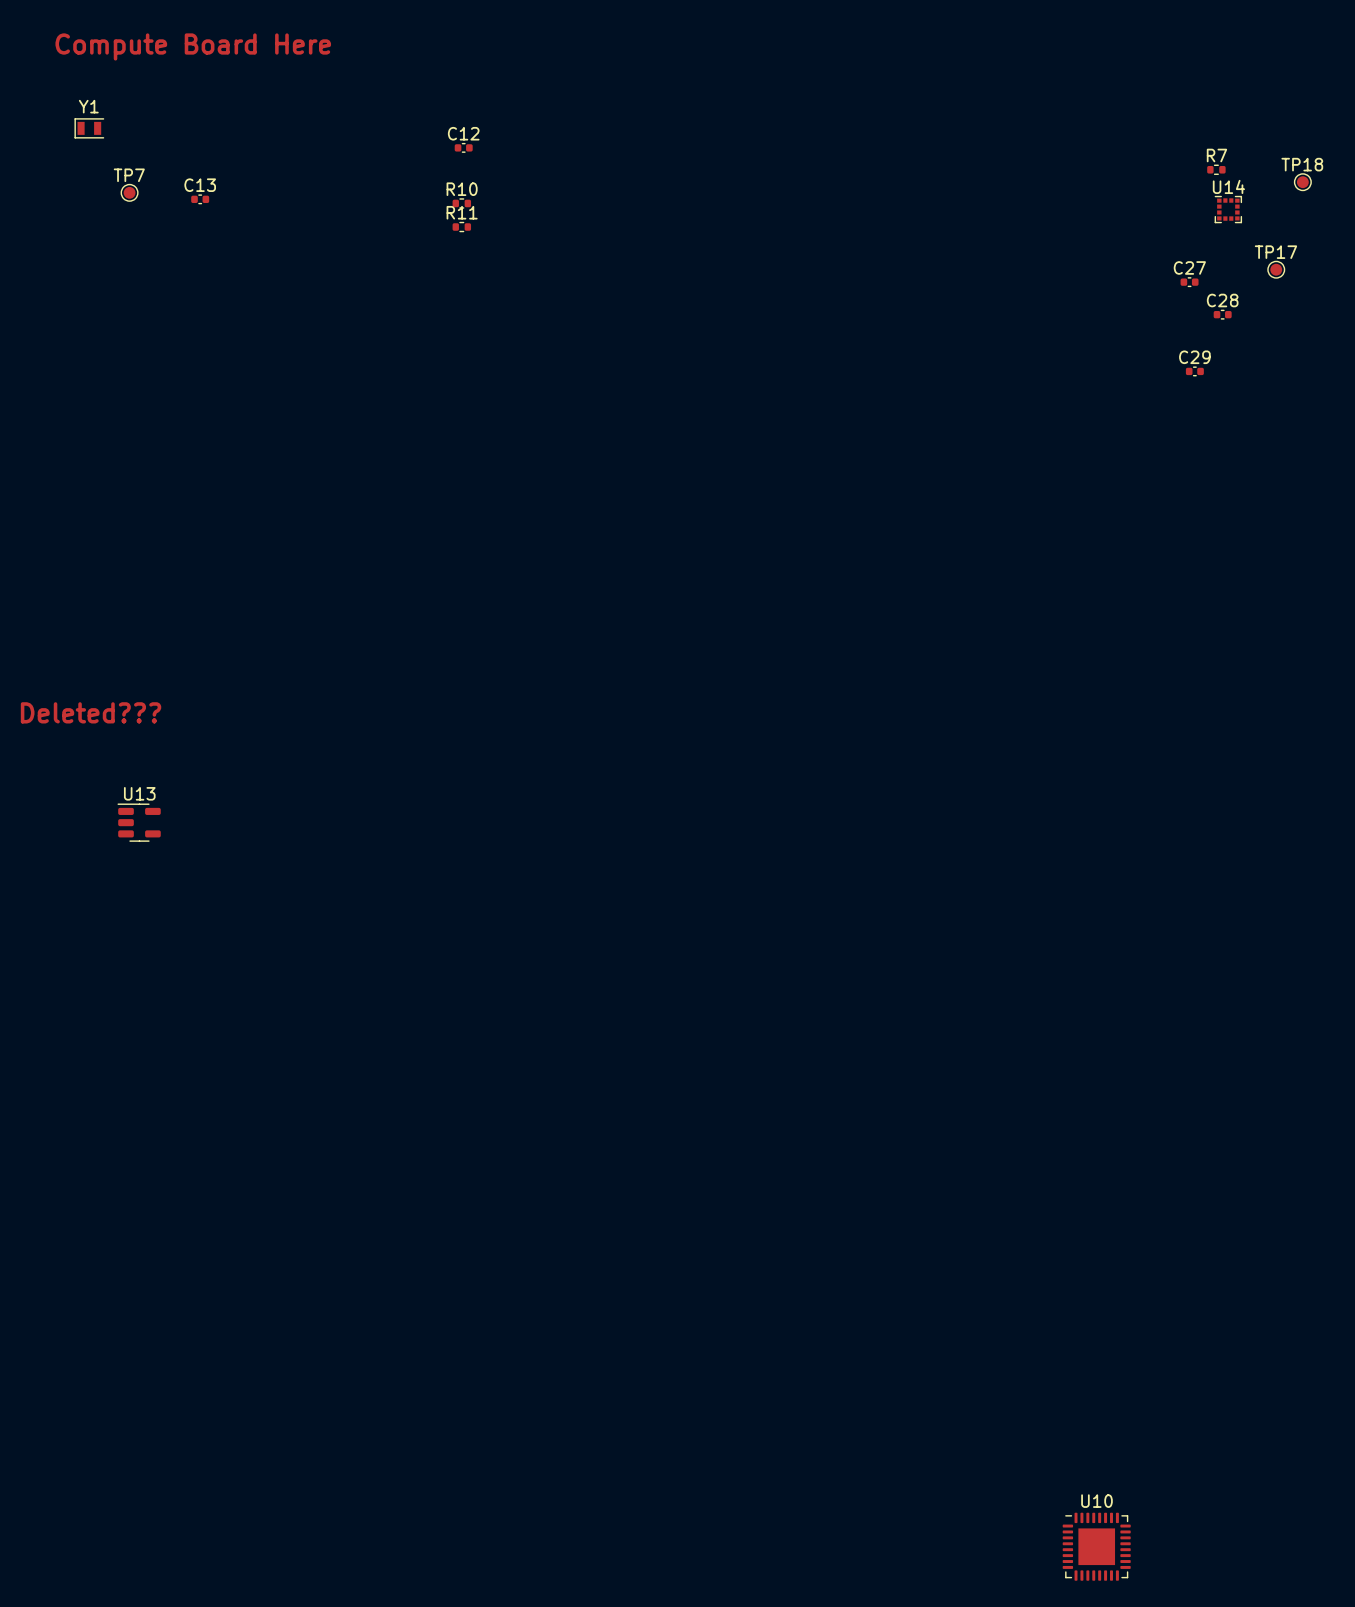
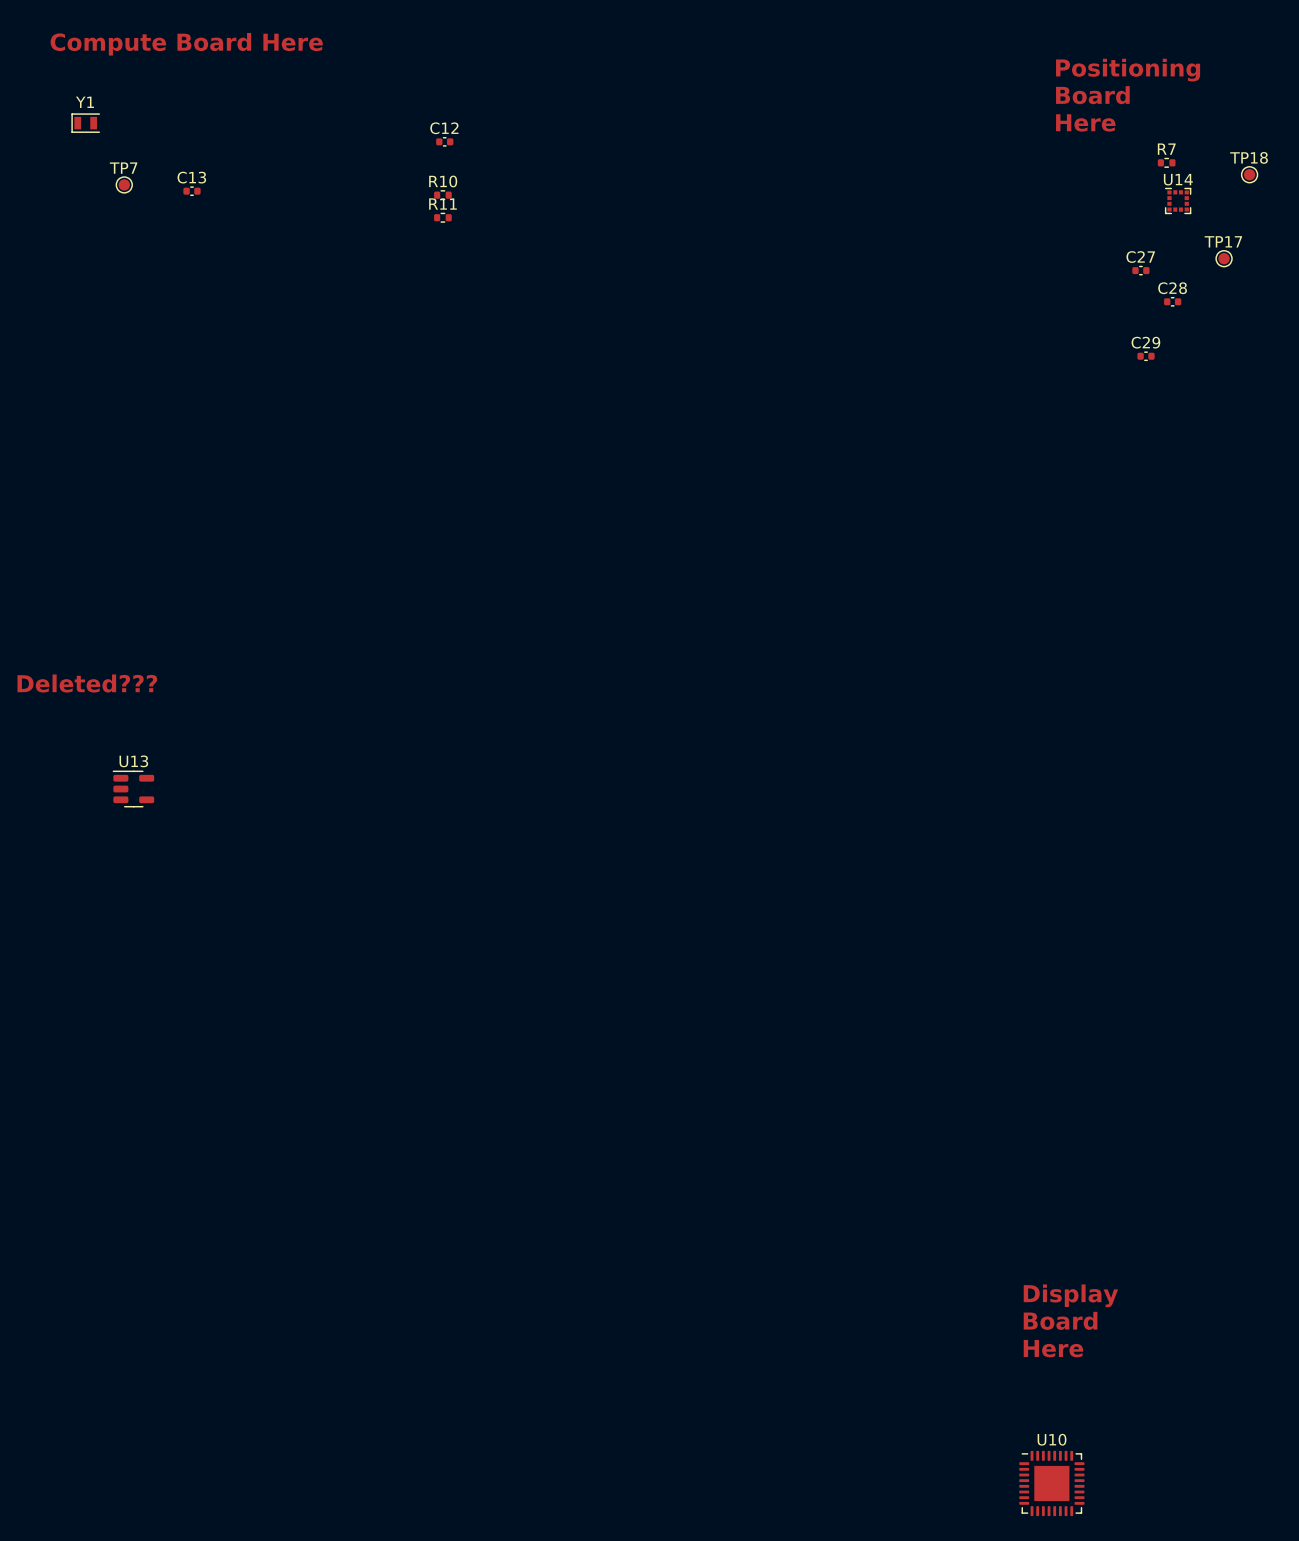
text: none -> Positioning (1128, 70)
text: none -> Board (1092, 95)
text: none -> Here (1085, 122)
text: none -> Display (1070, 1295)
text: none -> Board (1060, 1320)
text: none -> Here (1053, 1348)

